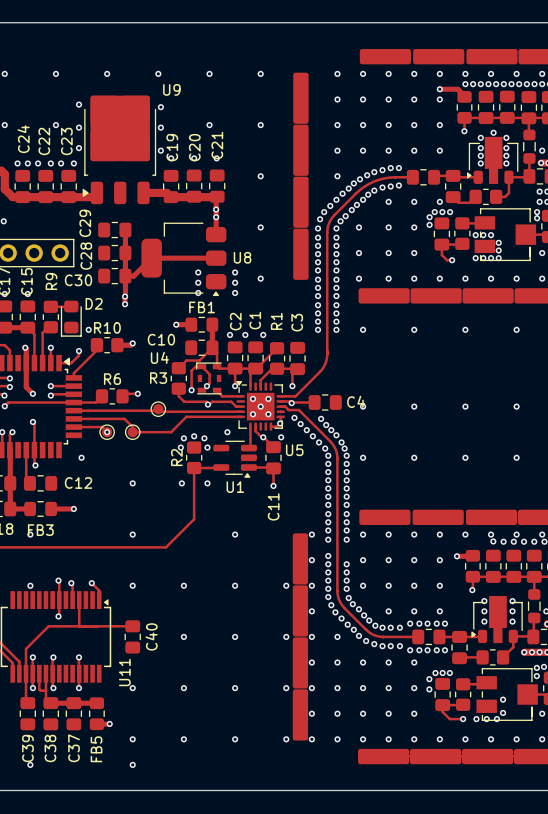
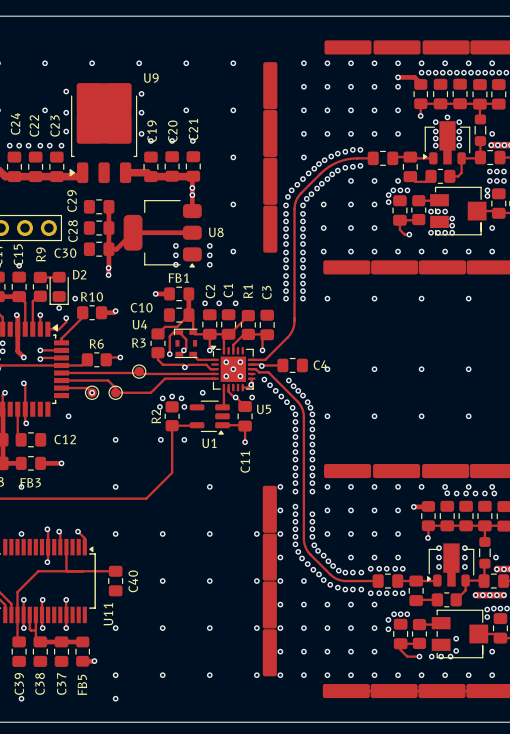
via: none -> (59, 308)

